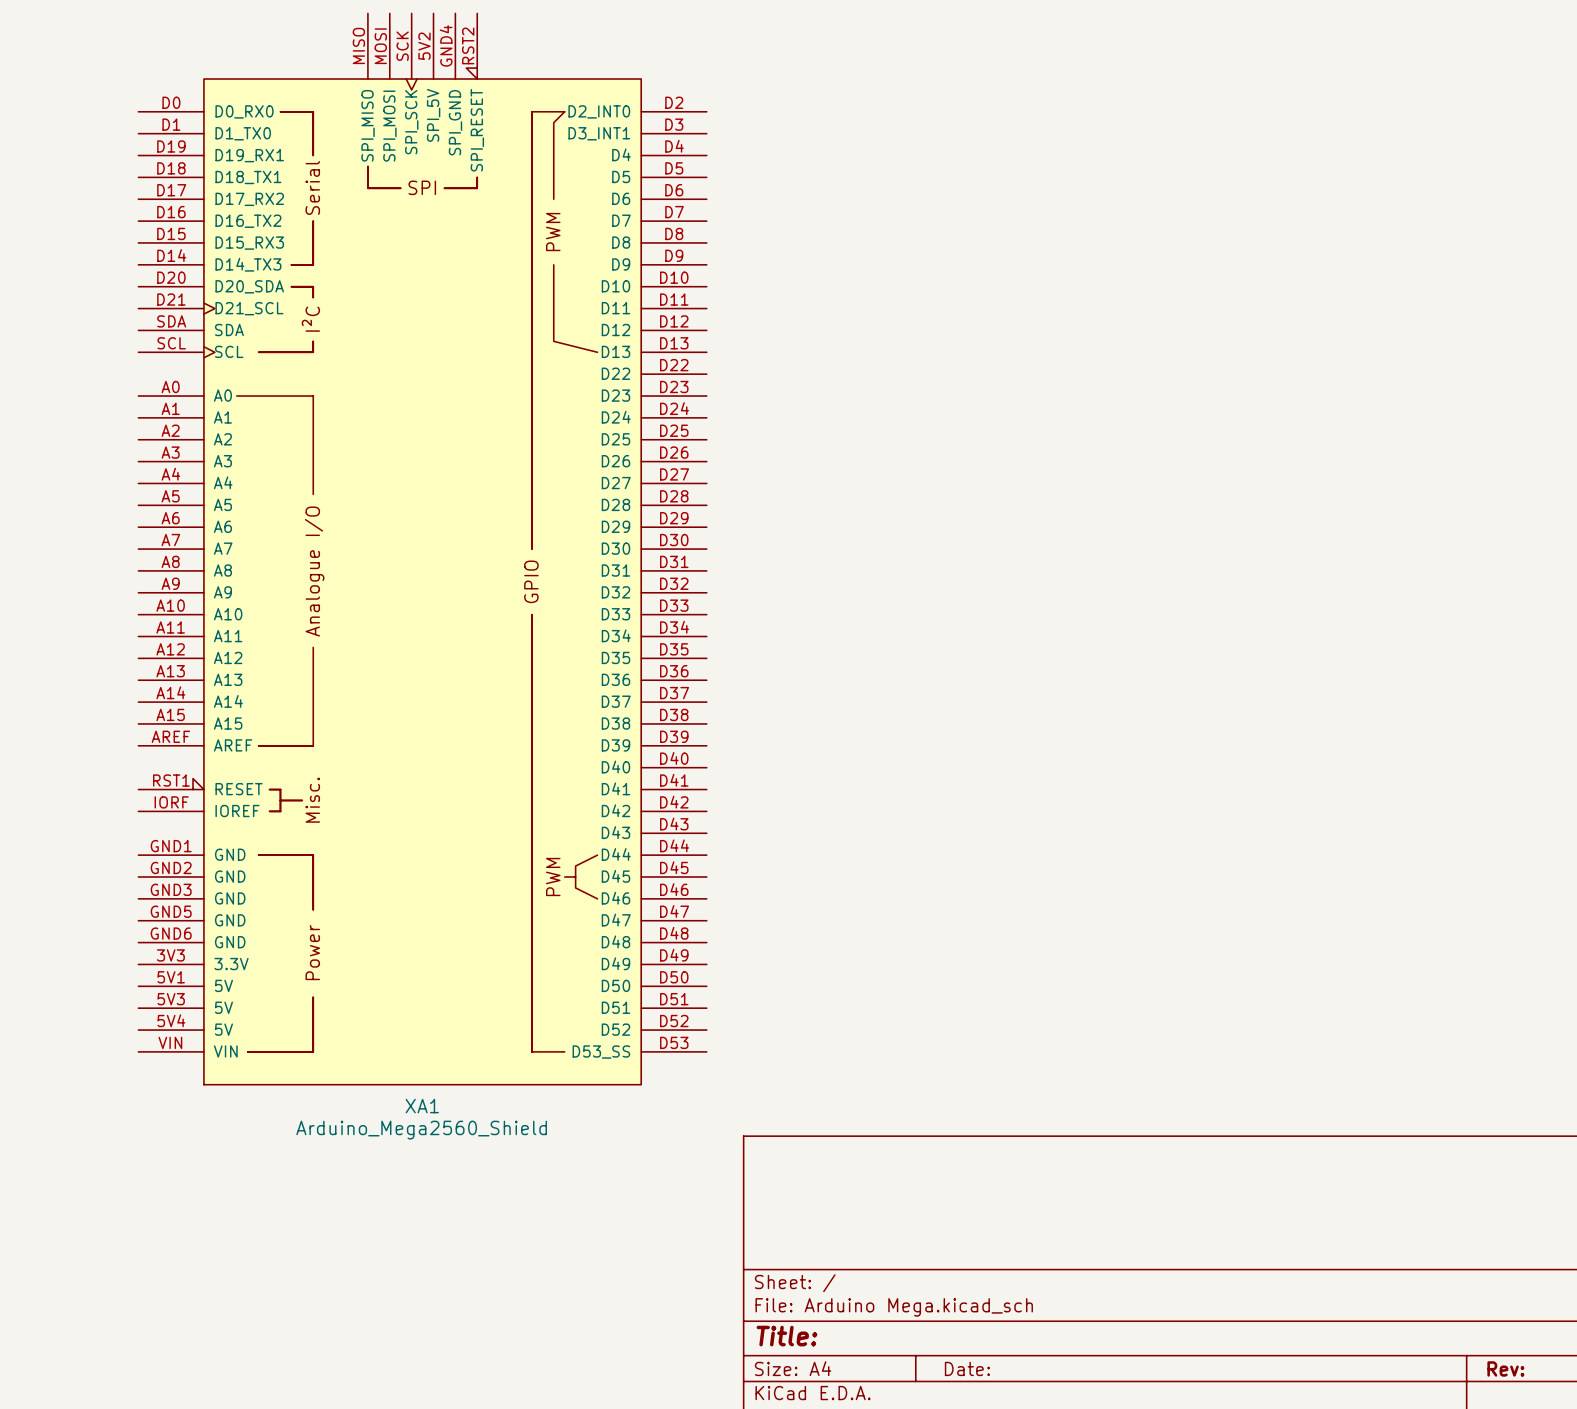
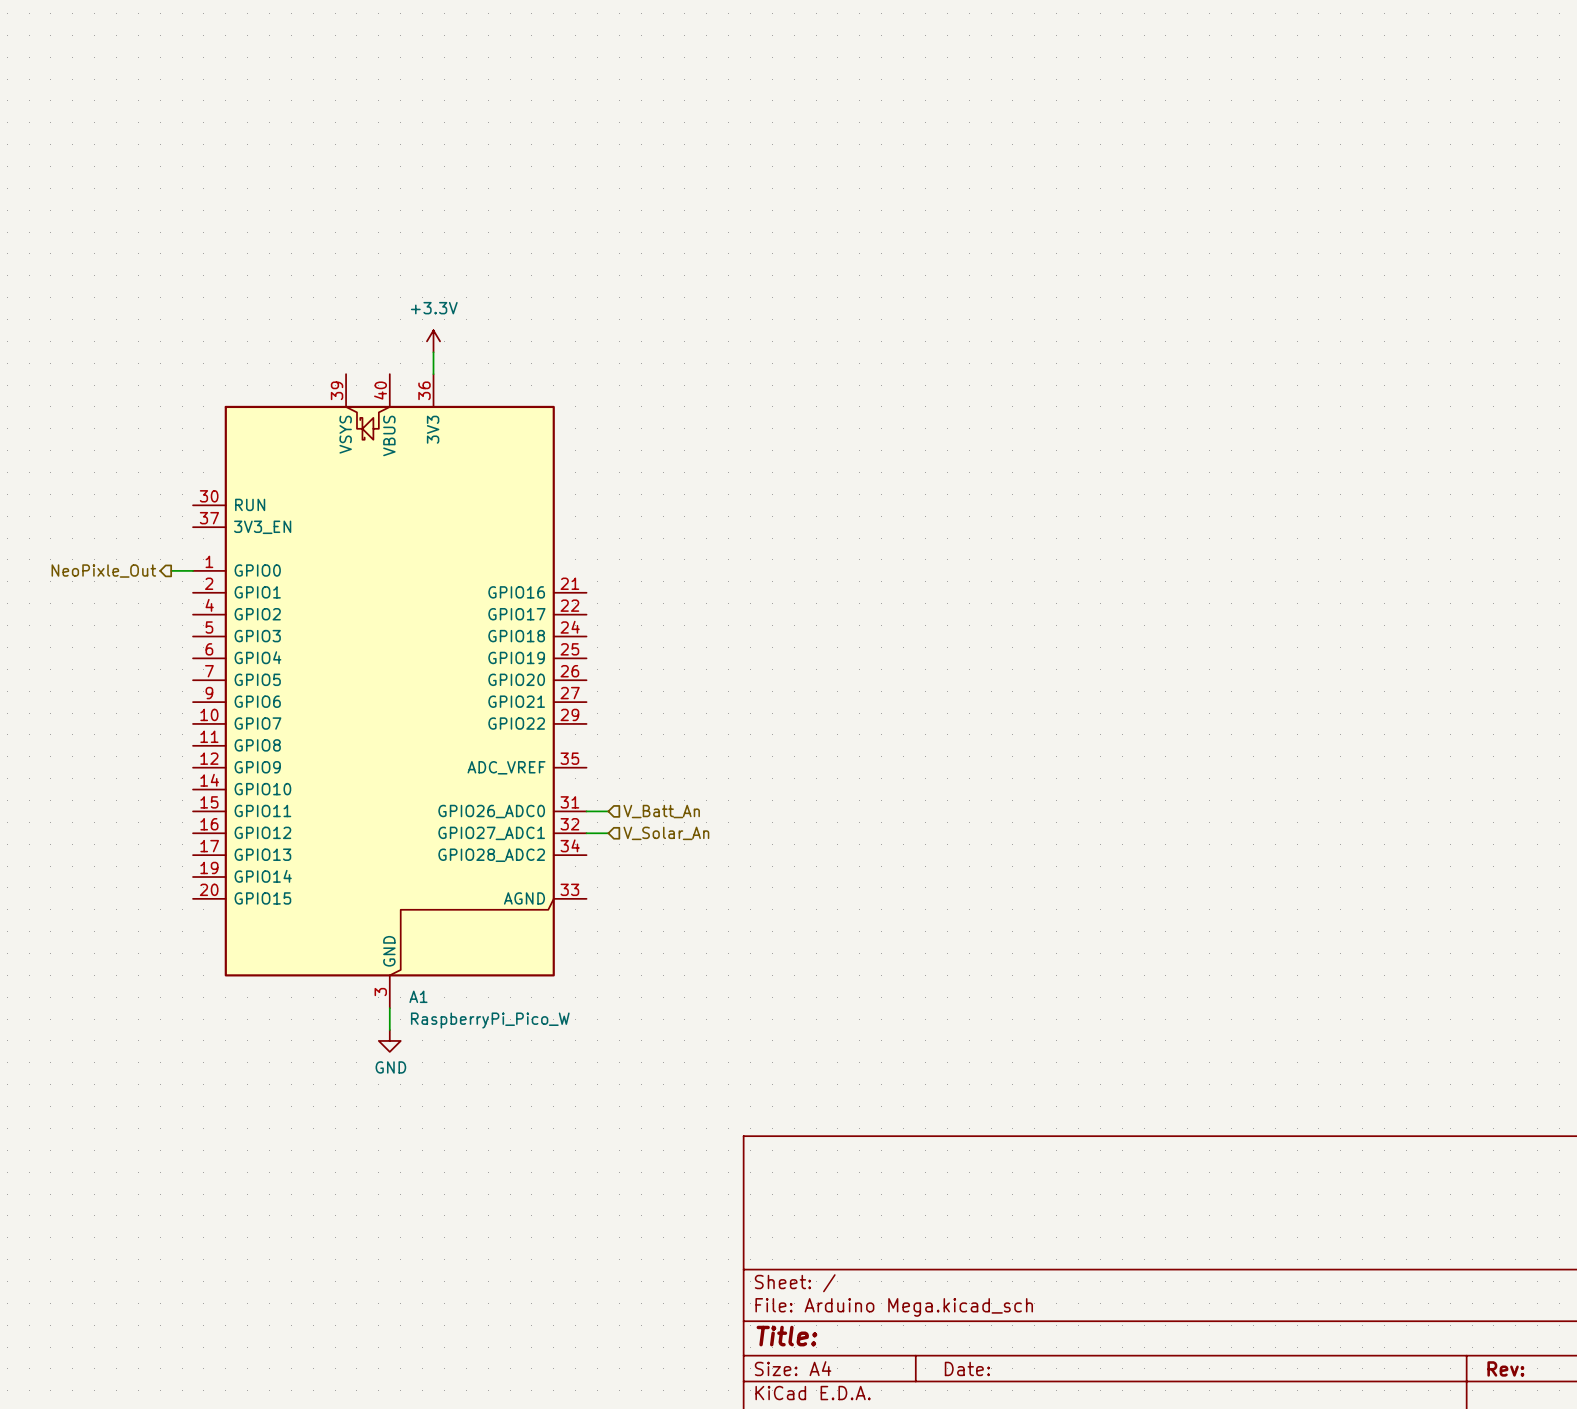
power symbol: none -> +3.3V (433, 341)
XA1: Arduino_Mega2560_Shield (422, 549) -> none
hierarchical label: none -> NeoPixle_Out (103, 571)
A1: none -> RaspberryPi_Pico_W (389, 691)
hierarchical label: none -> V_Batt_An (661, 811)
hierarchical label: none -> V_Solar_An (666, 833)
power symbol: none -> GND (389, 1040)

